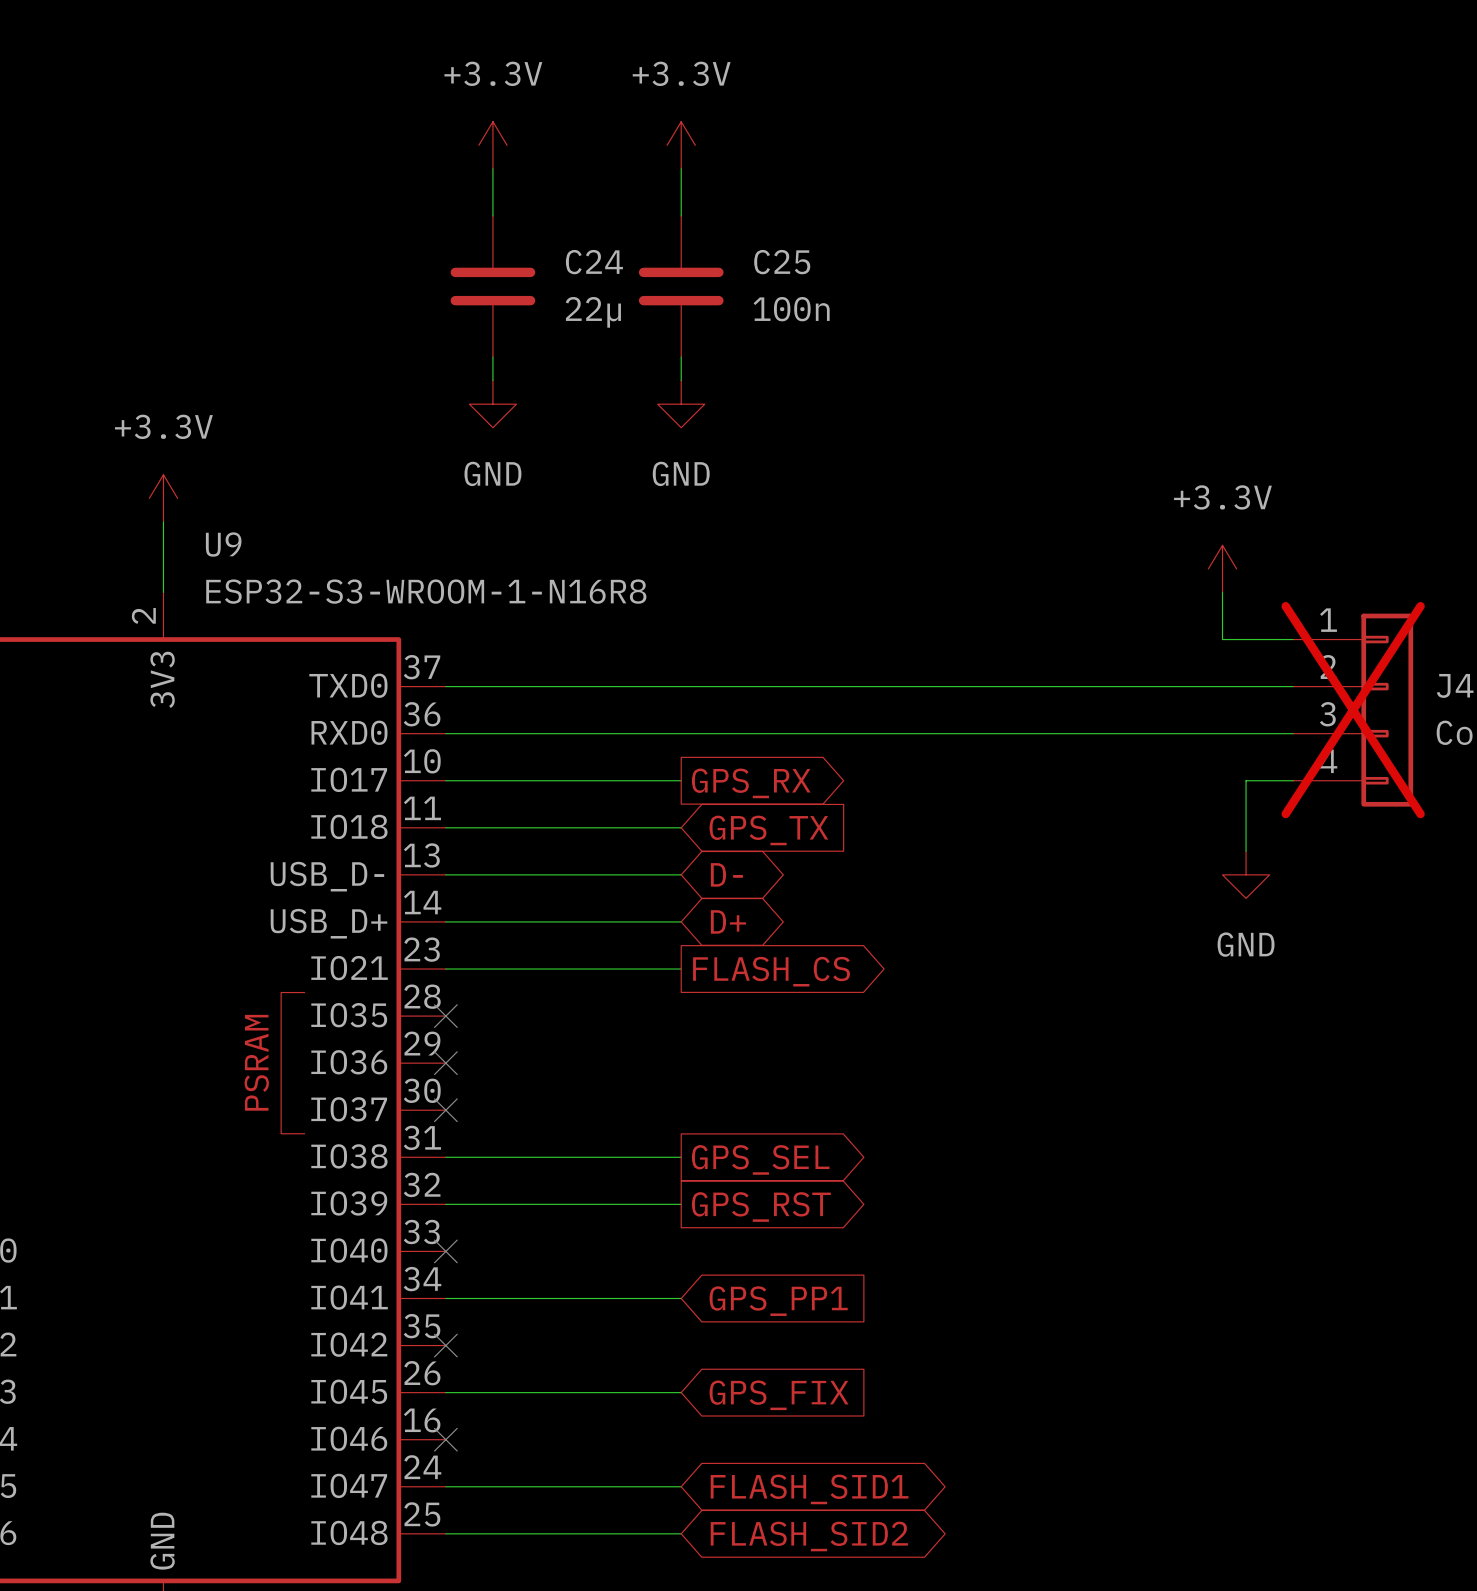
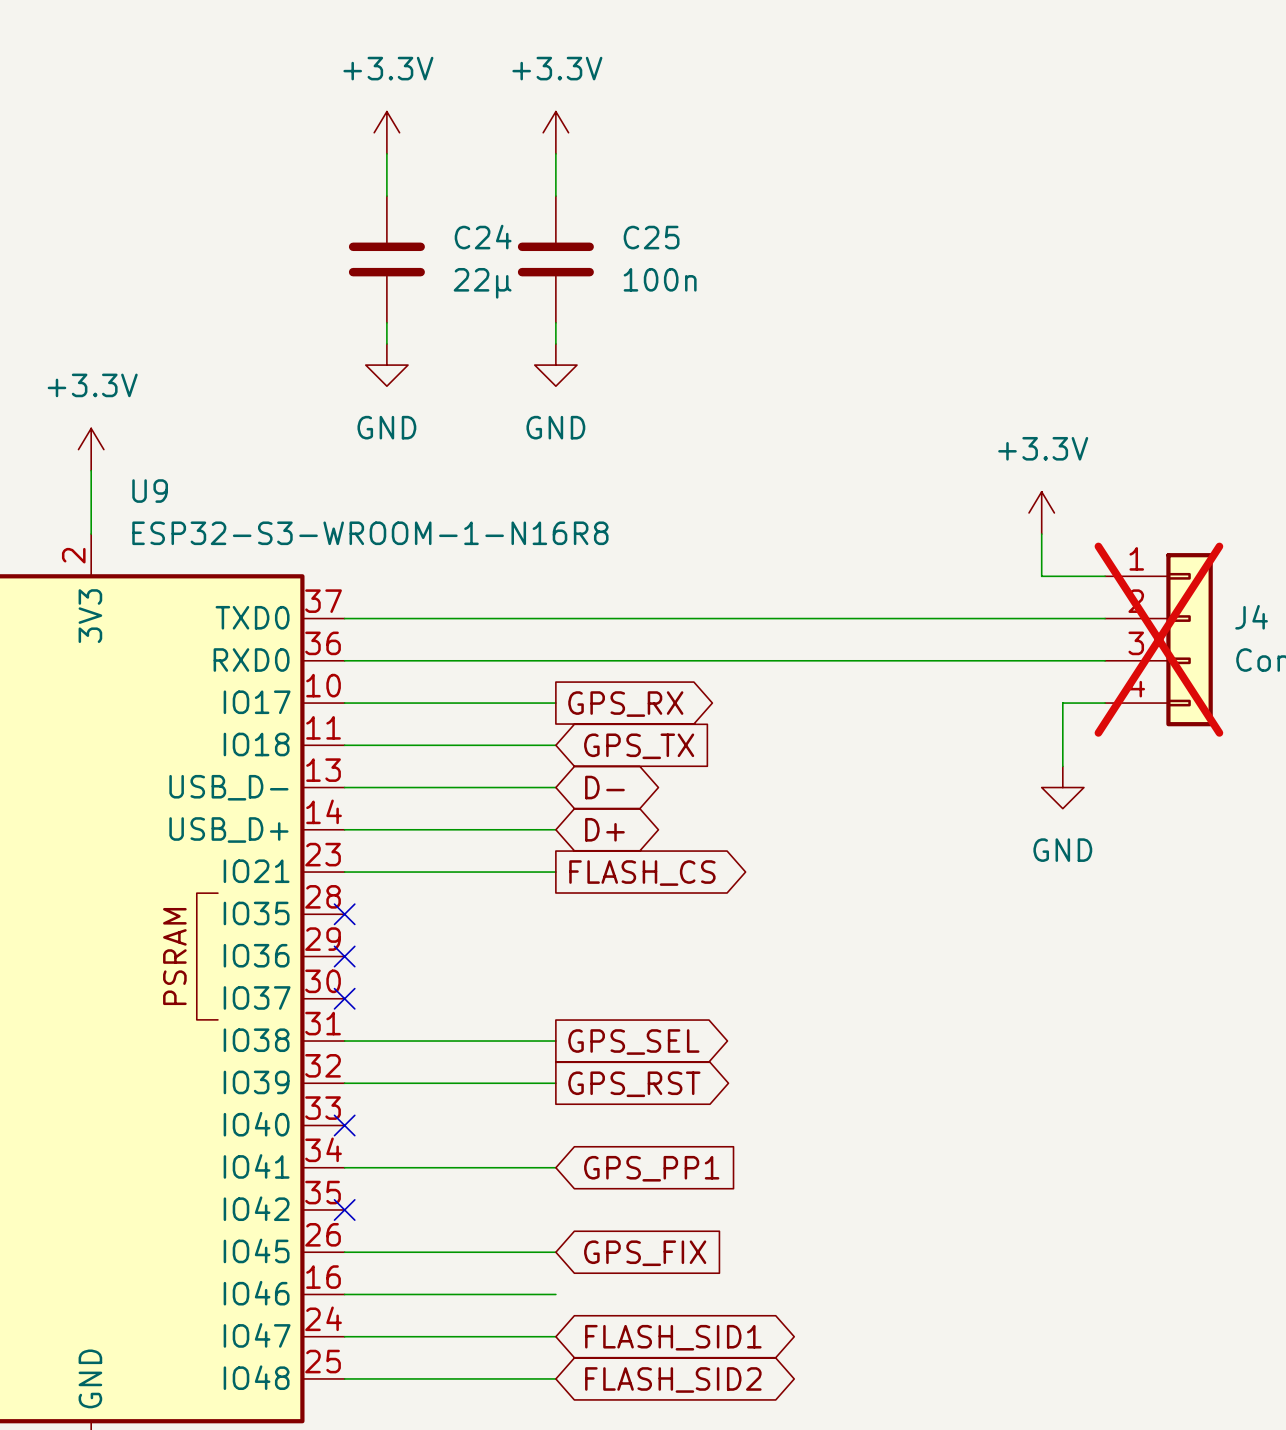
wire: none -> (344, 1294) (555, 1294)
no-connect mark: (445, 1439) -> none

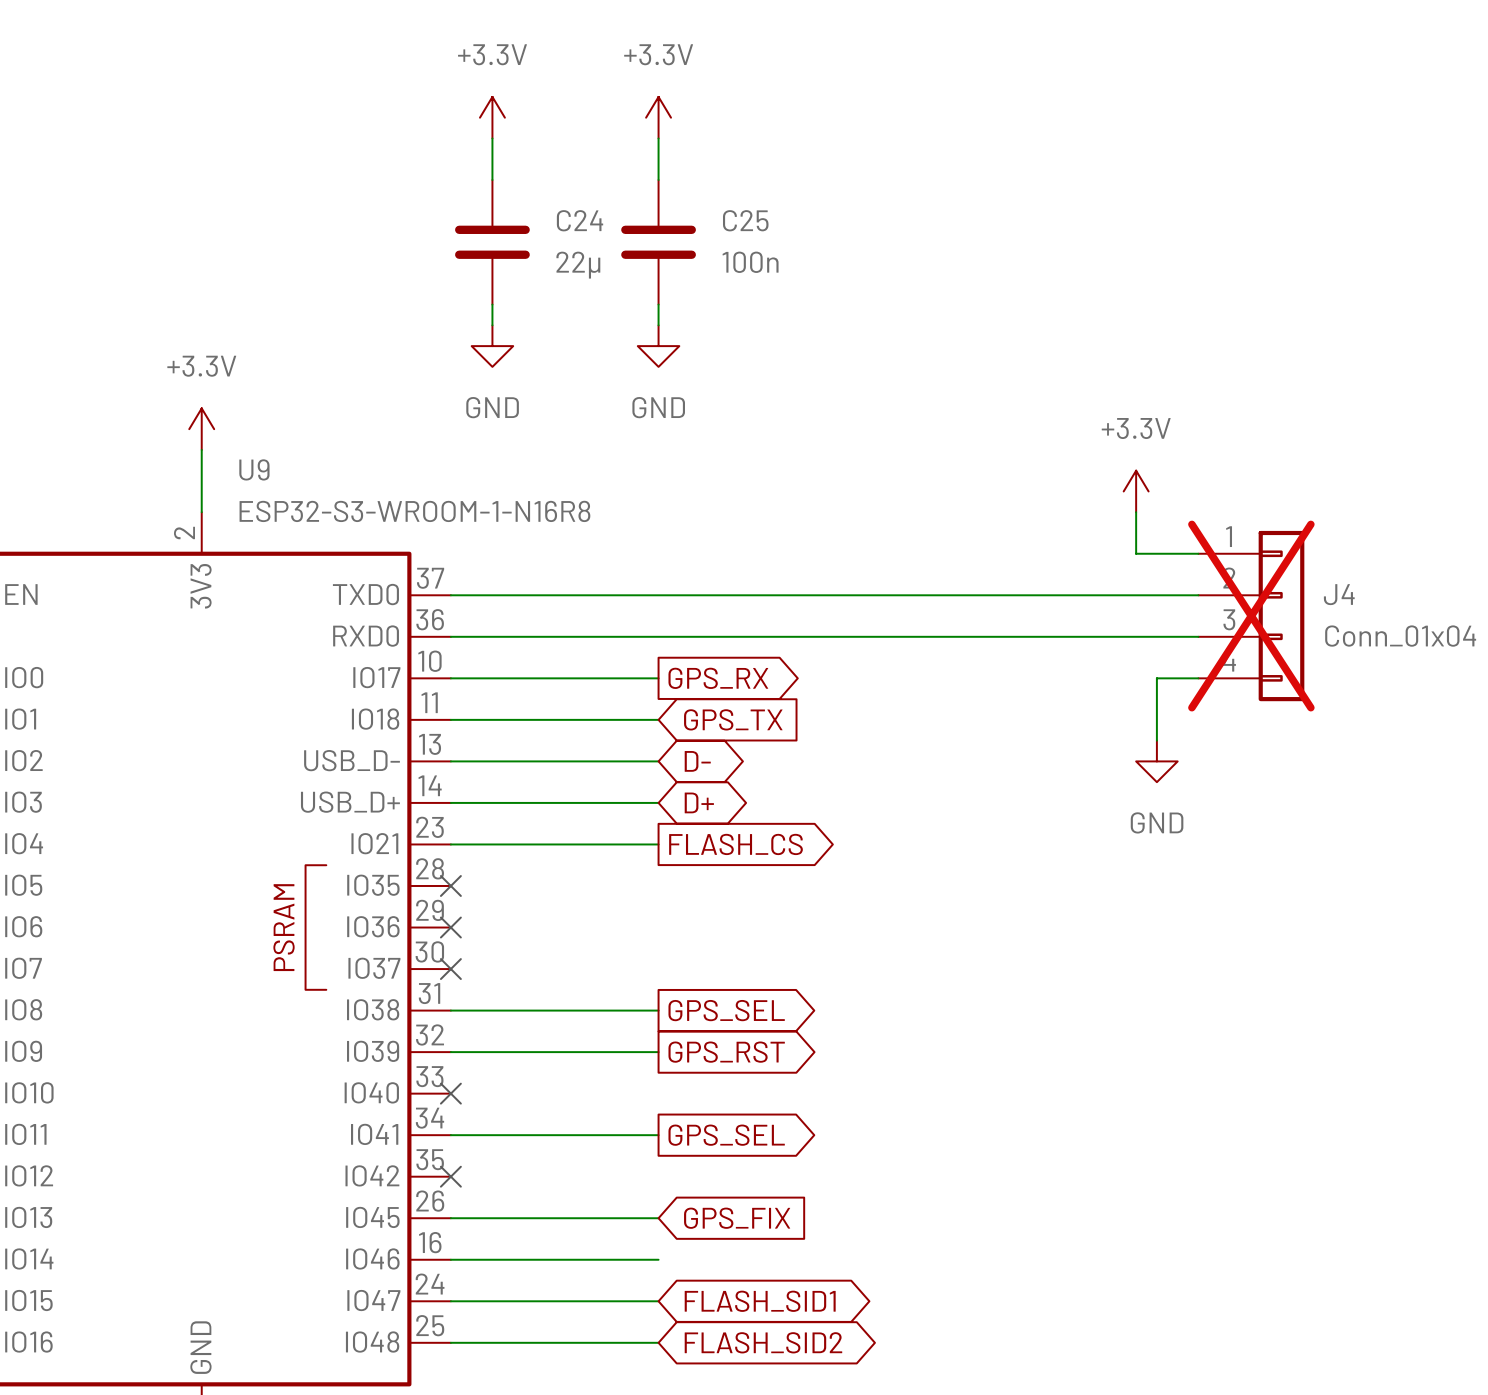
global label shape: input (651, 1168) -> output (726, 1135)
global label: GPS_PP1 (651, 1168) -> GPS_SEL (726, 1135)

